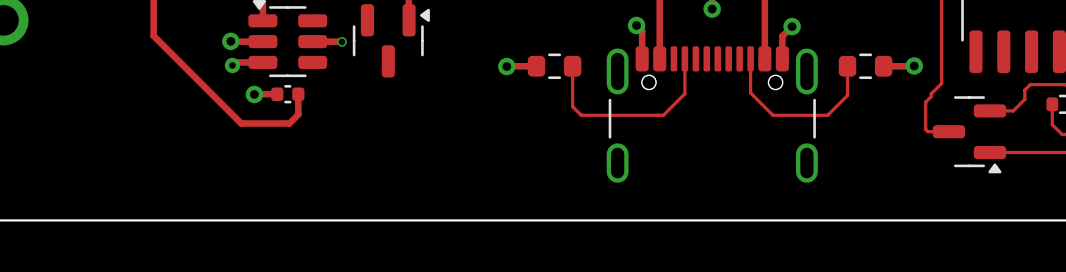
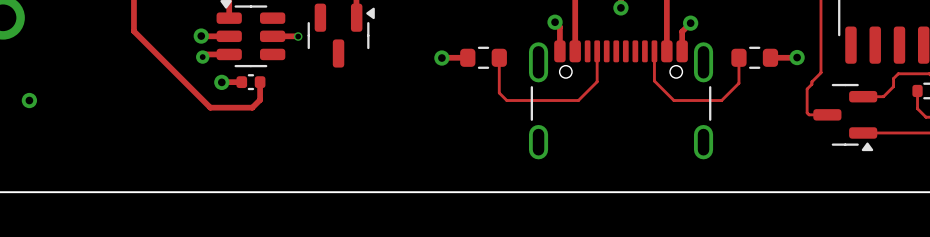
via: none -> (29, 100)

